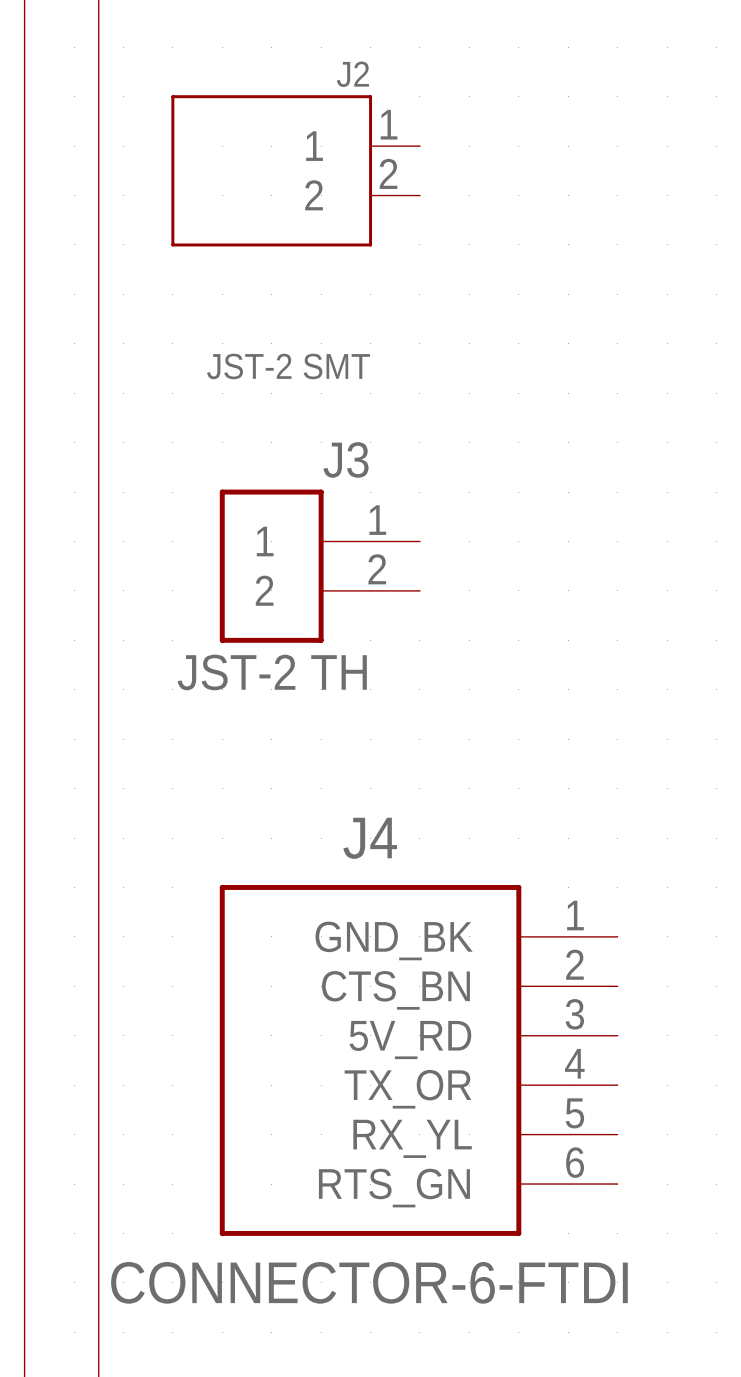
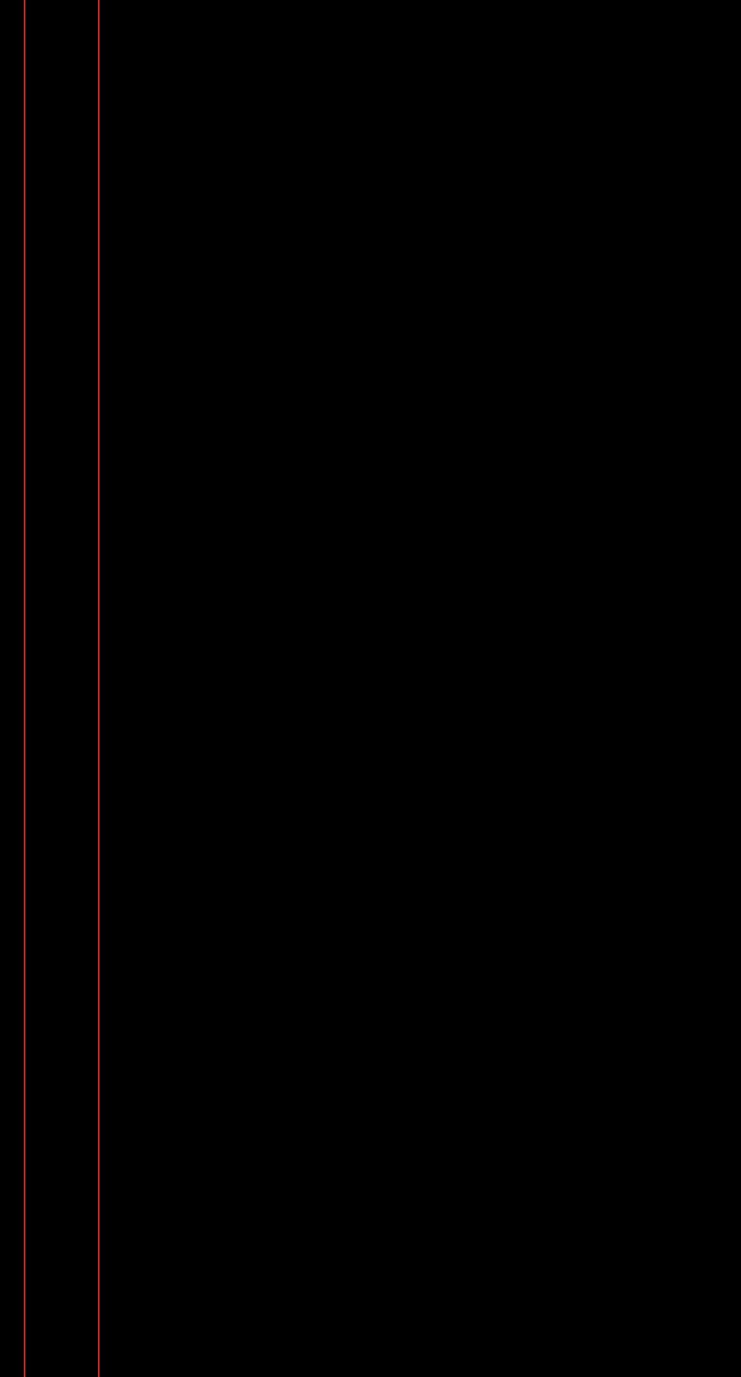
J2: JST-2 SMT (295, 170) -> none
J3: JST-2 TH (319, 566) -> none
J4: CONNECTOR-6-FTDI (418, 1060) -> none

